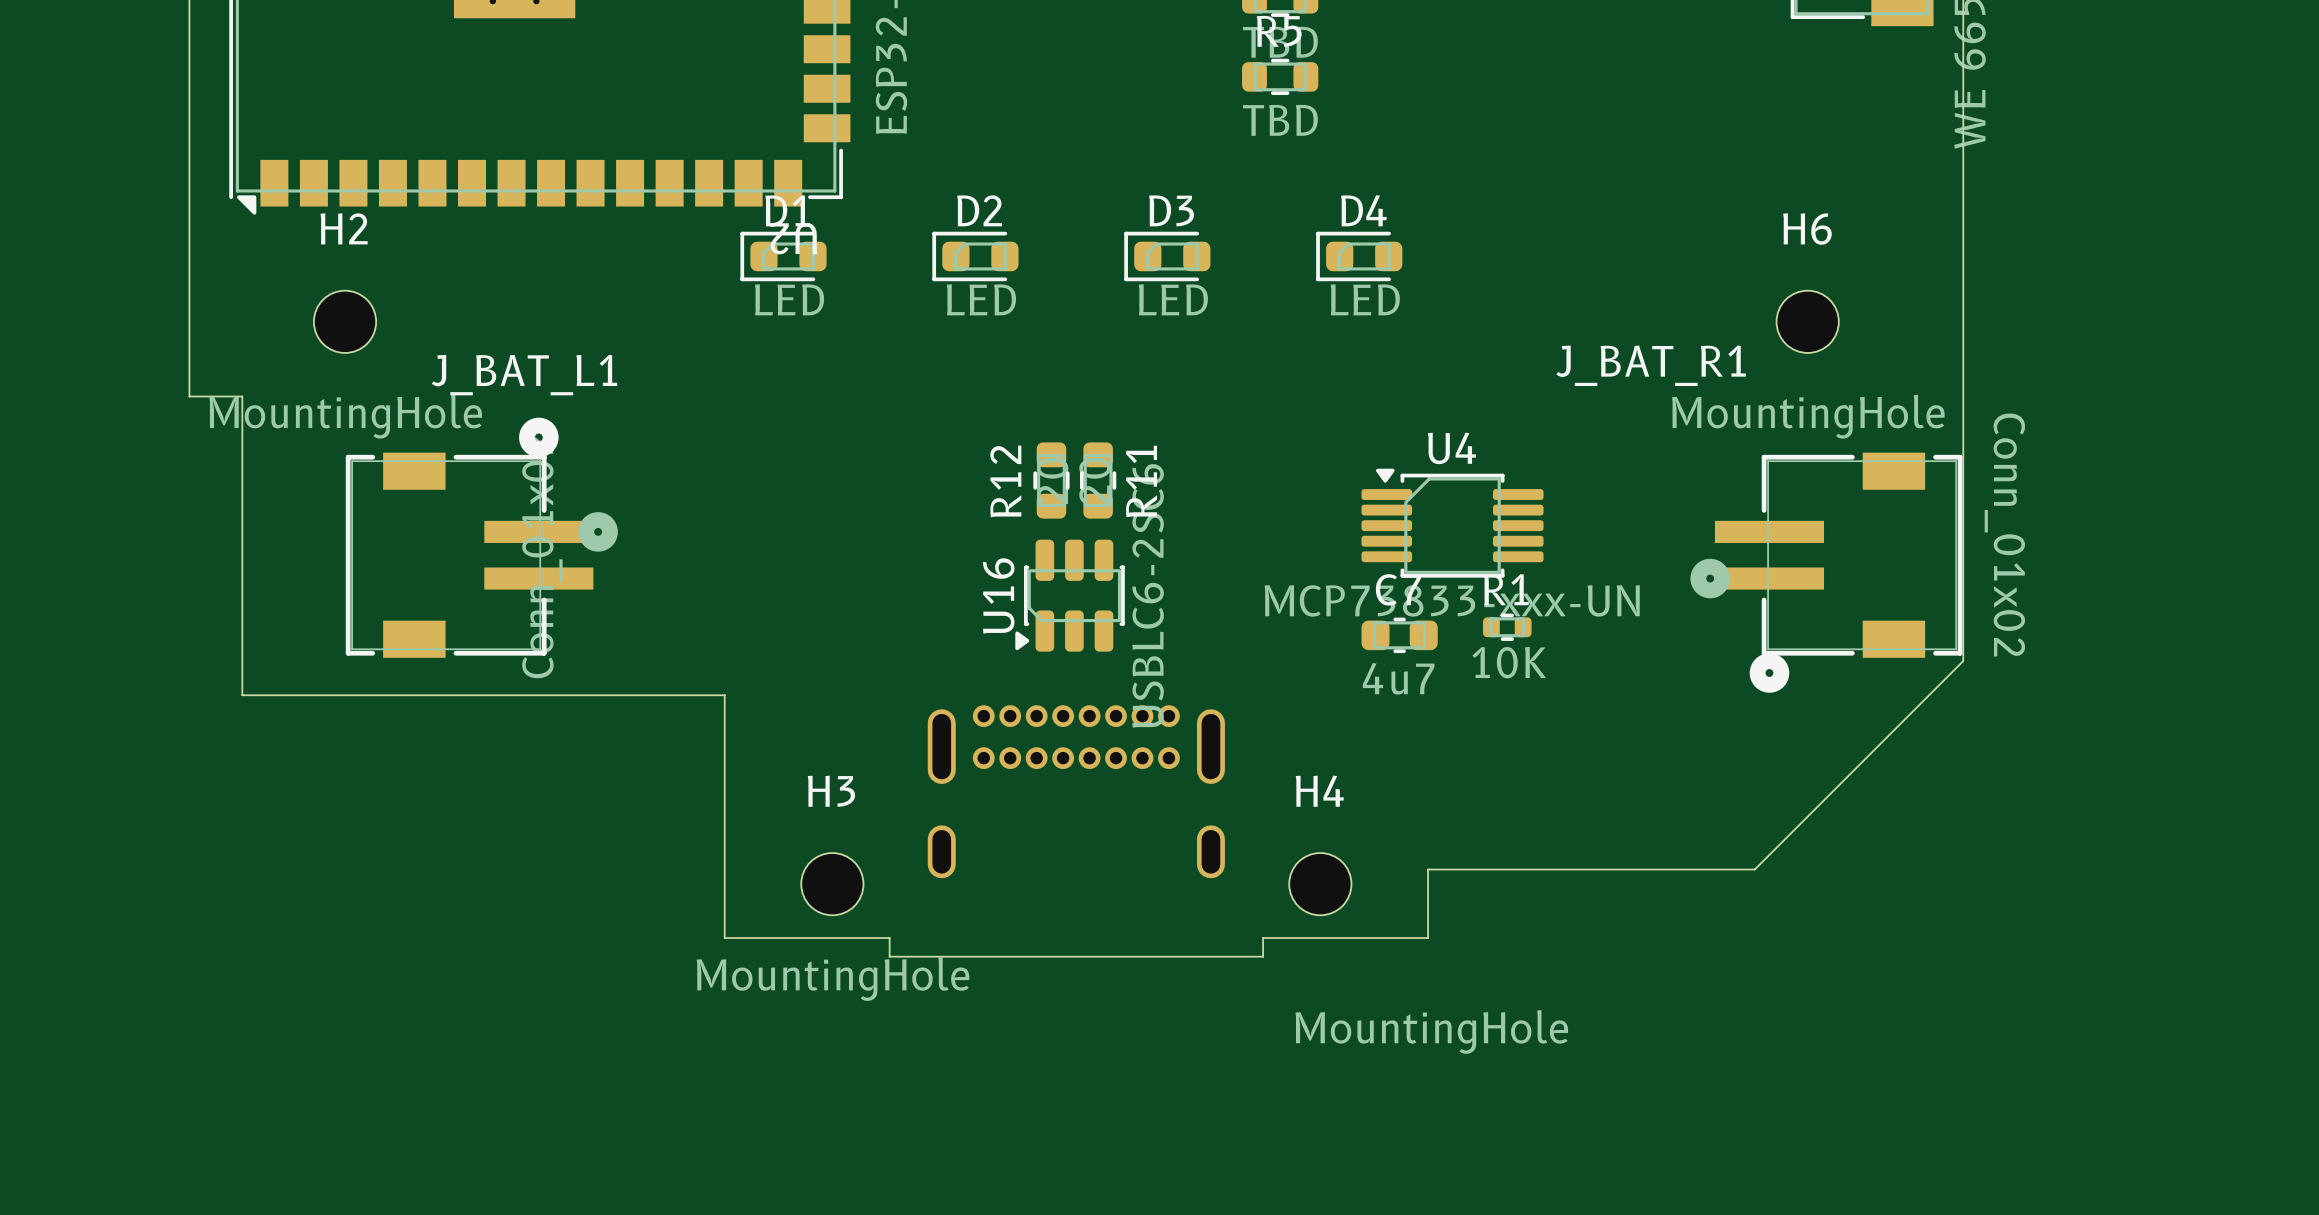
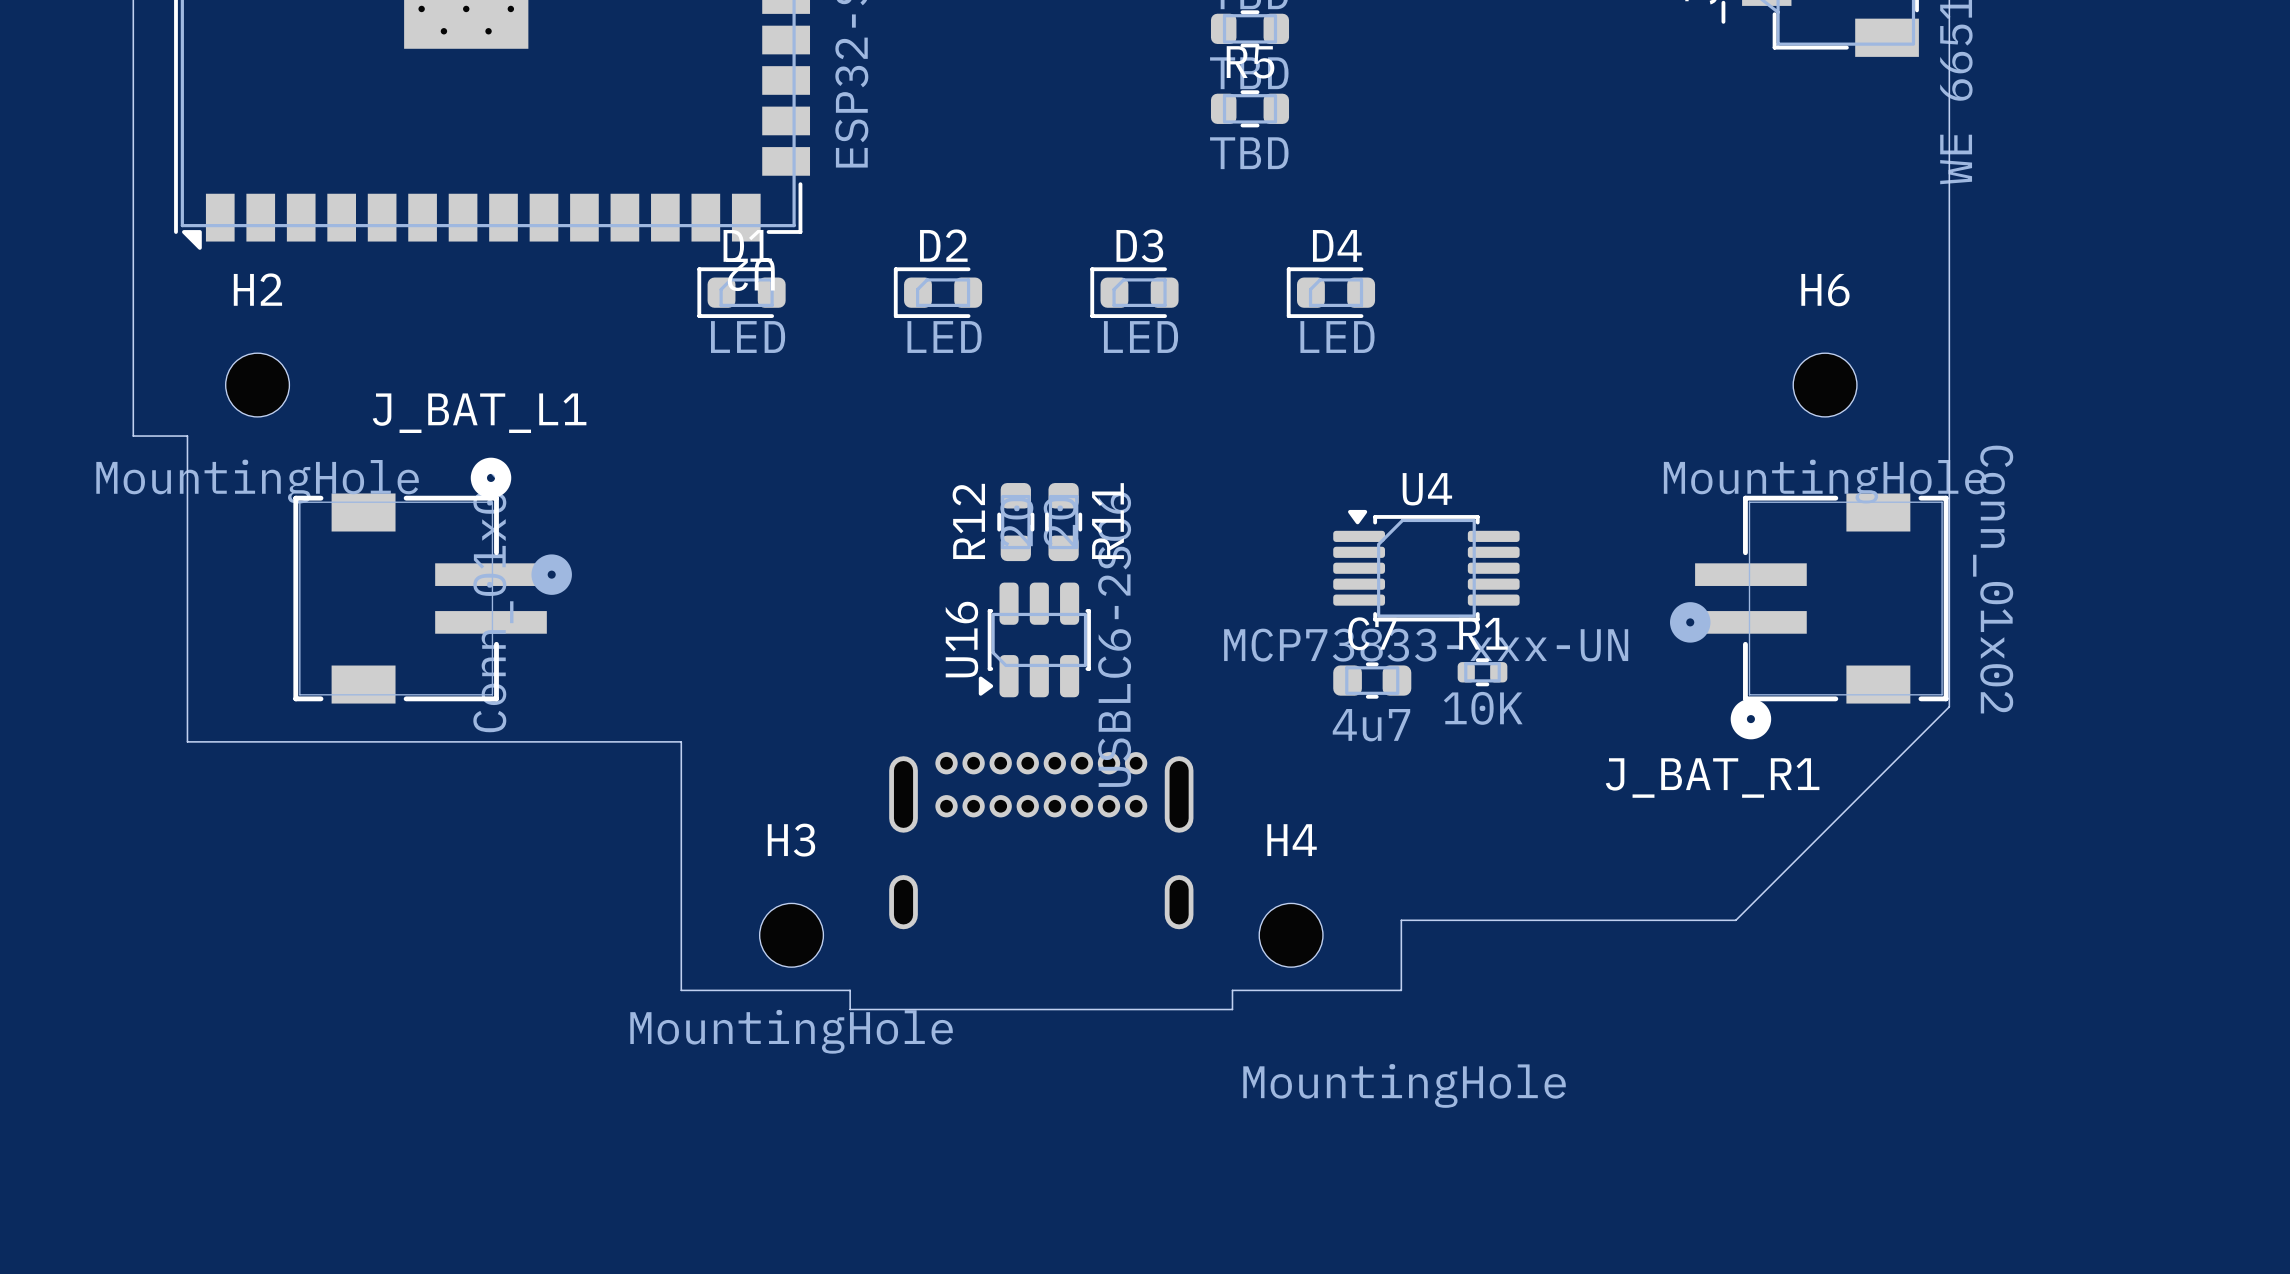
H2 position: (345, 321) -> (257, 385)
H6 position: (1807, 321) -> (1825, 385)
J_BAT_R1 name position: J_BAT_R1 (1651, 365) -> J_BAT_R1 (1712, 778)

